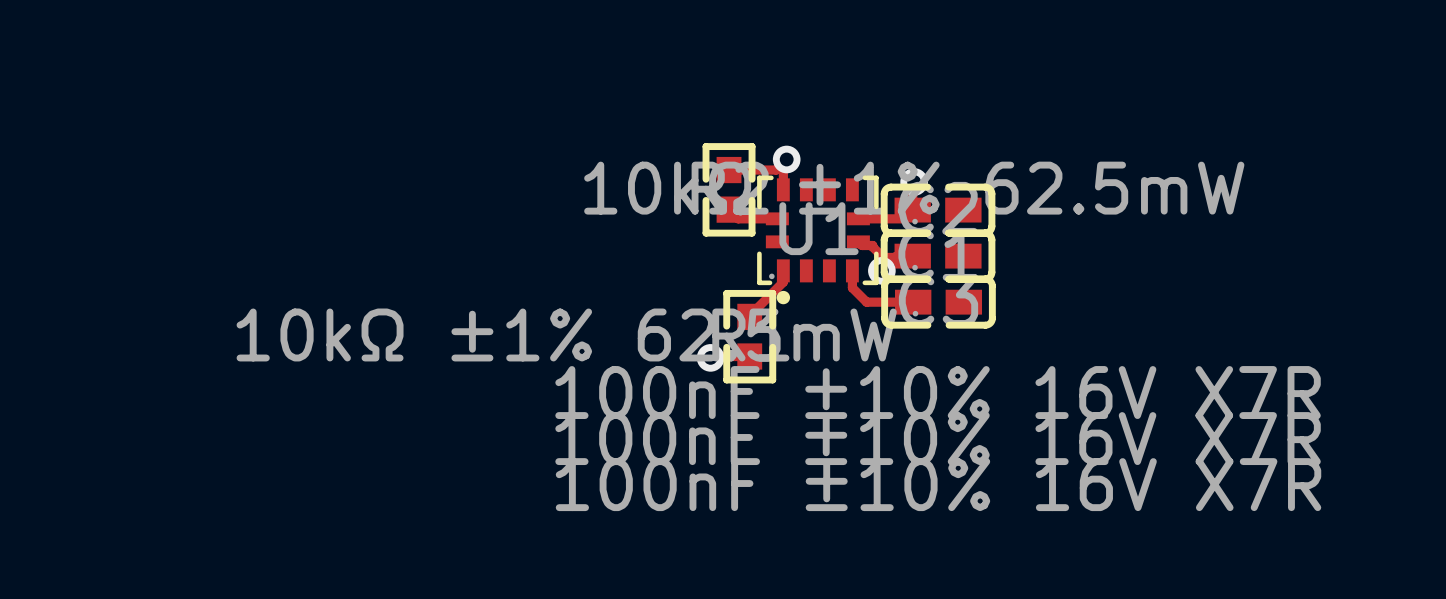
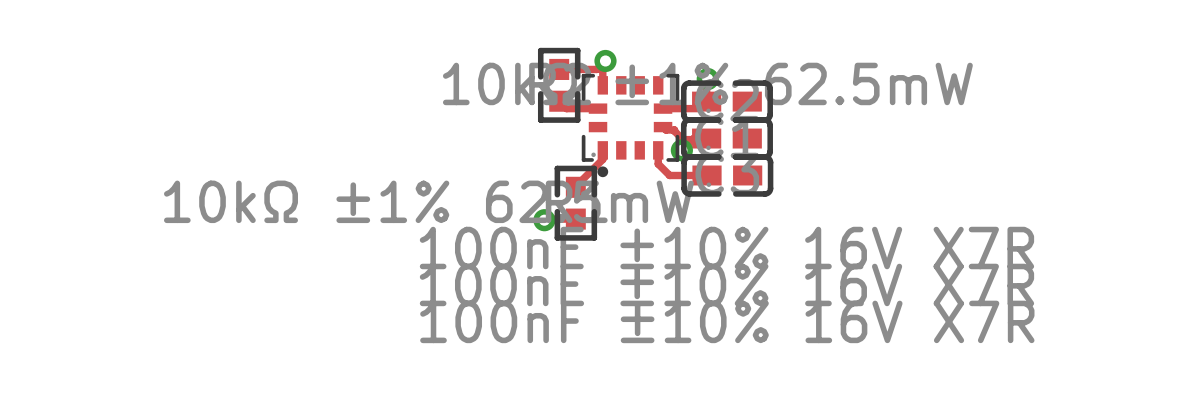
U1 name: U1 (818, 228) -> none

